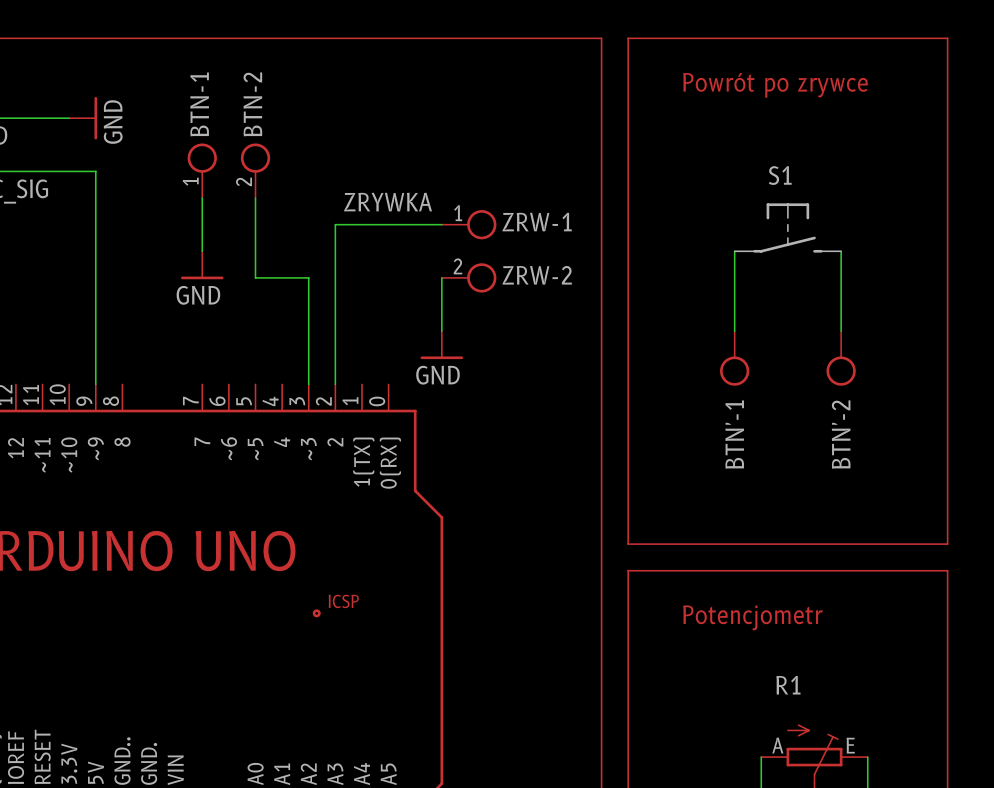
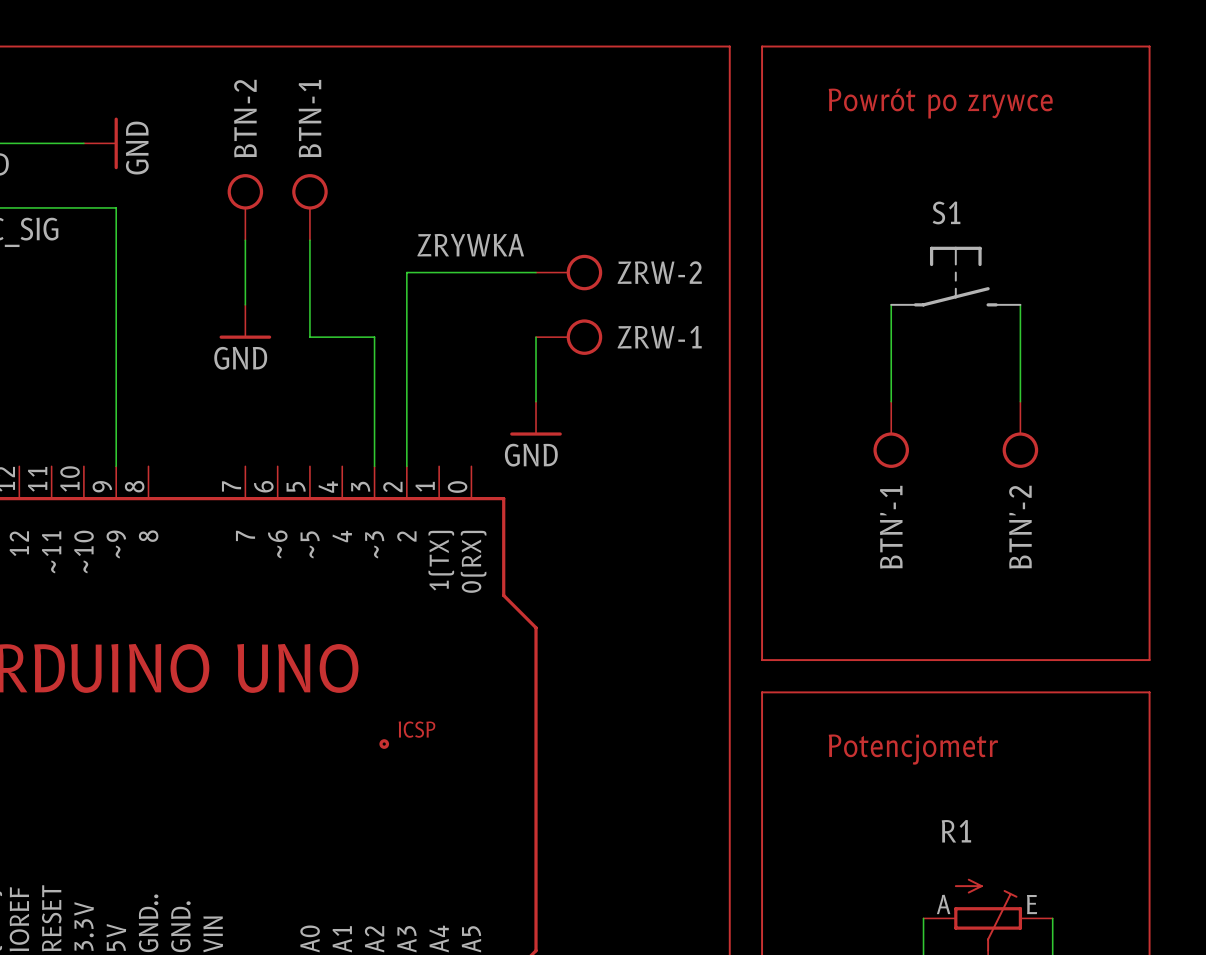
BTN-1 name position: BTN-1 (199, 104) -> BTN-1 (309, 118)
BTN-2 name position: BTN-2 (252, 104) -> BTN-2 (245, 118)
BTN-1 position: (202, 170) -> (309, 207)
BTN-2 position: (255, 170) -> (245, 207)
BTN-1 pin number: 1 (190, 181) -> none
BTN-2 pin number: 2 (243, 181) -> none
ZRW-1 pin number: 1 (458, 213) -> none
ZRW-1 name position: ZRW-1 (537, 222) -> ZRW-1 (659, 337)
ZRW-1 position: (469, 224) -> (569, 337)
ZRW-2 pin number: 2 (458, 266) -> none
ZRW-2 name position: ZRW-2 (537, 275) -> ZRW-2 (659, 272)
ZRW-2 position: (469, 277) -> (569, 272)

